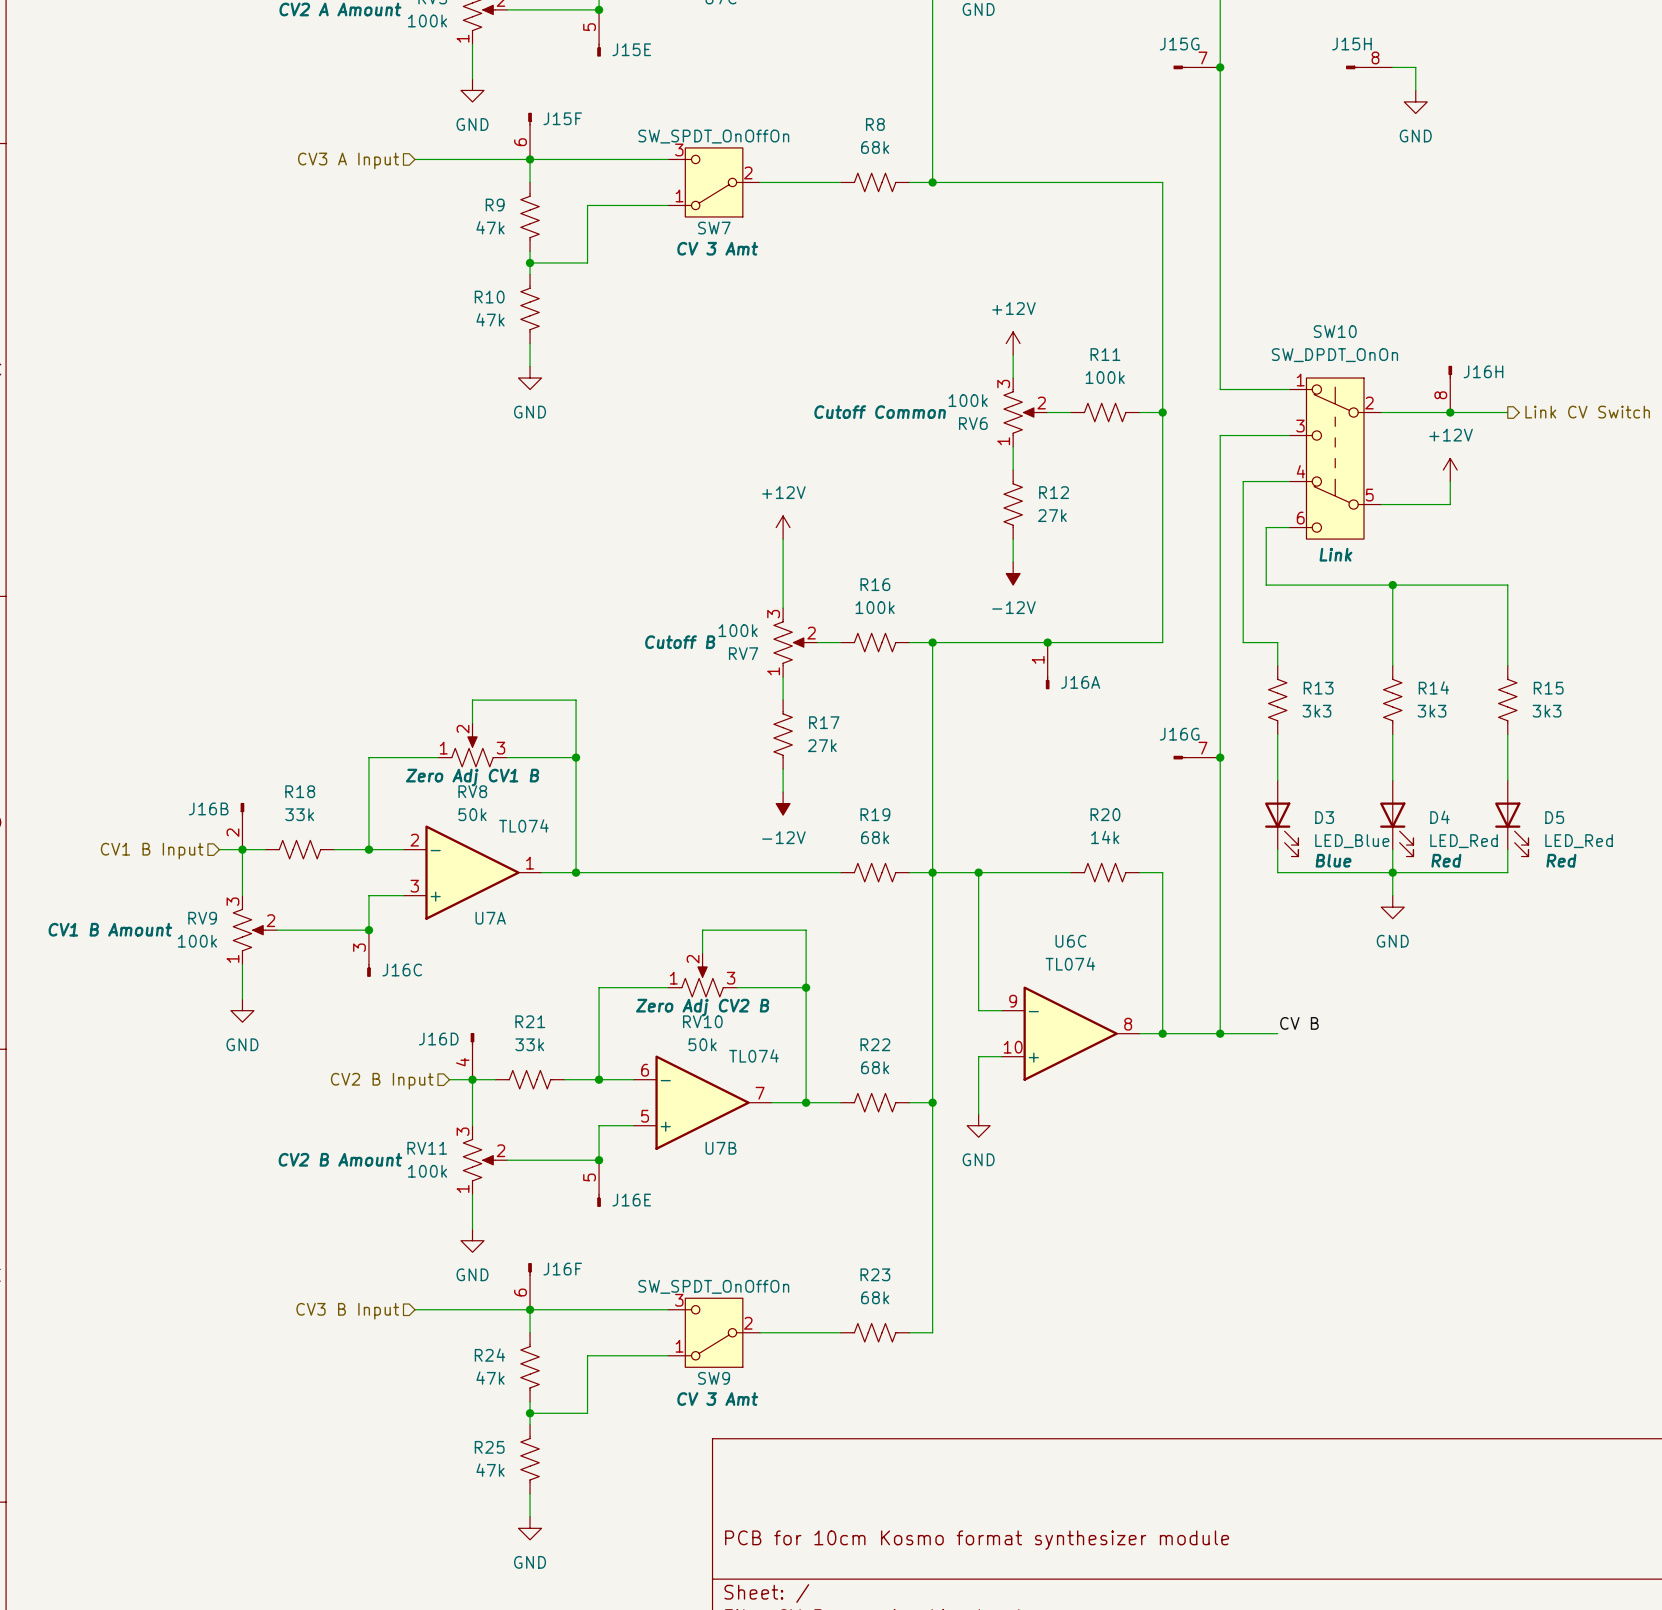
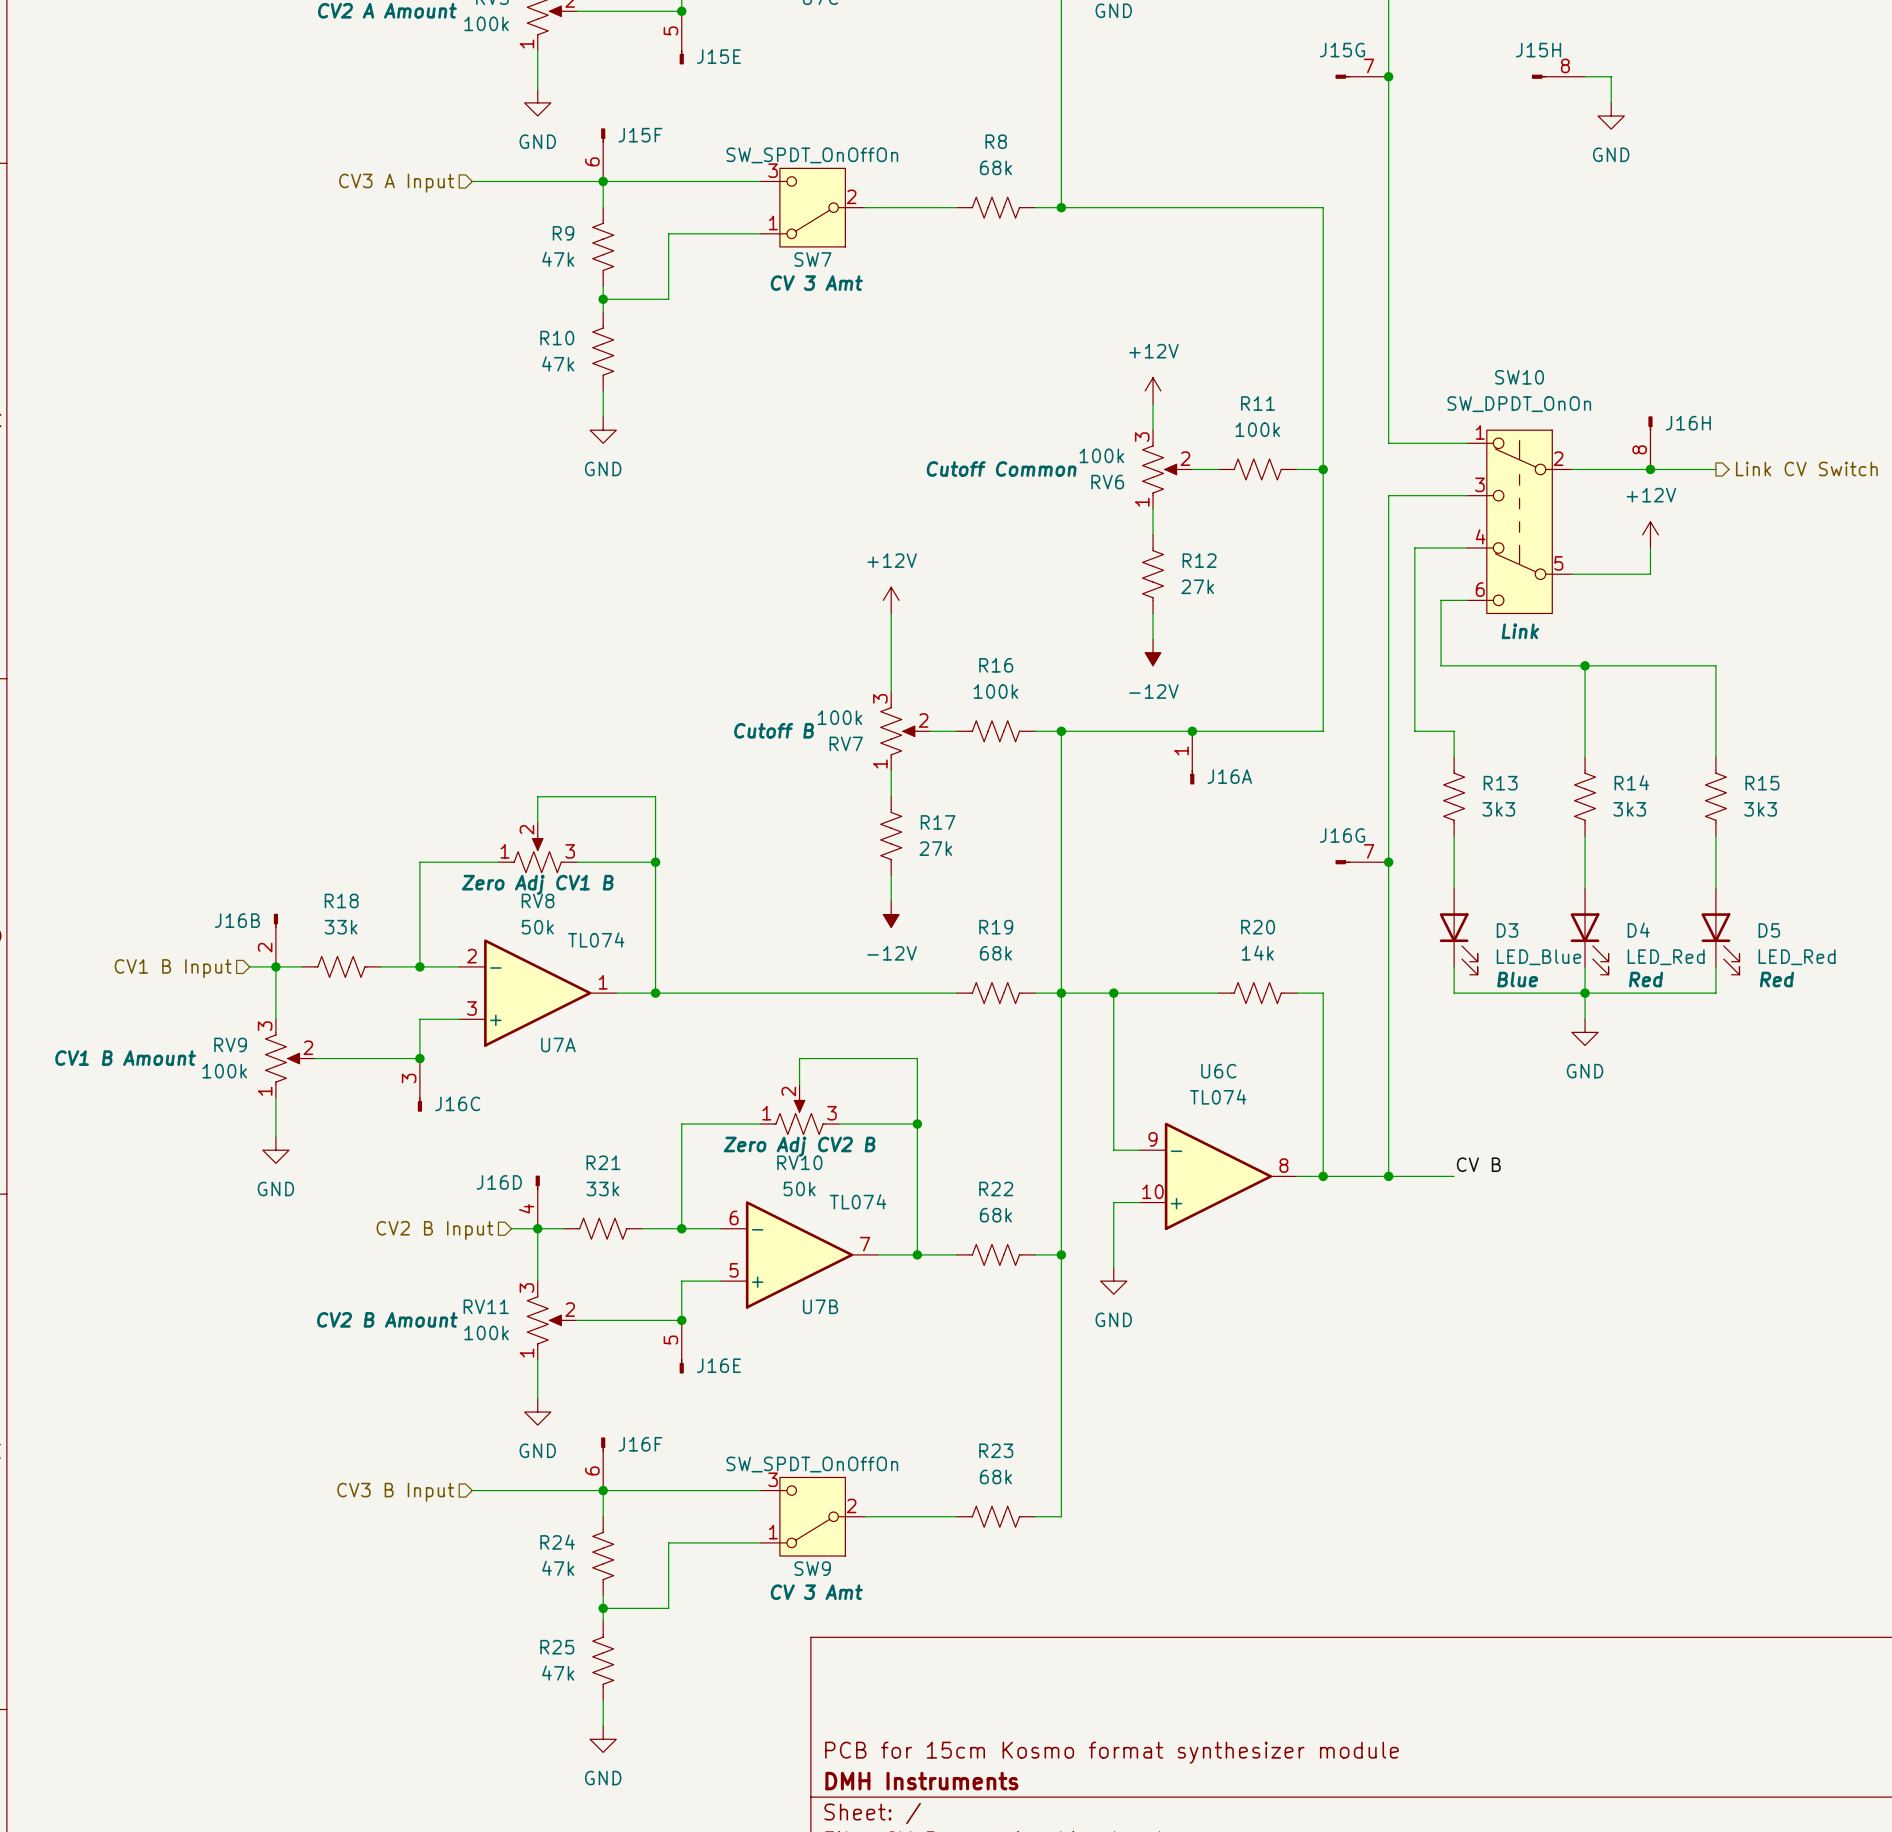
title block: PCB for 10cm Kosmo format synthesizer module (977, 1540) -> PCB for 15cm Kosmo format synthesizer module (1111, 1752)
title block: none -> DMH Instruments (921, 1781)

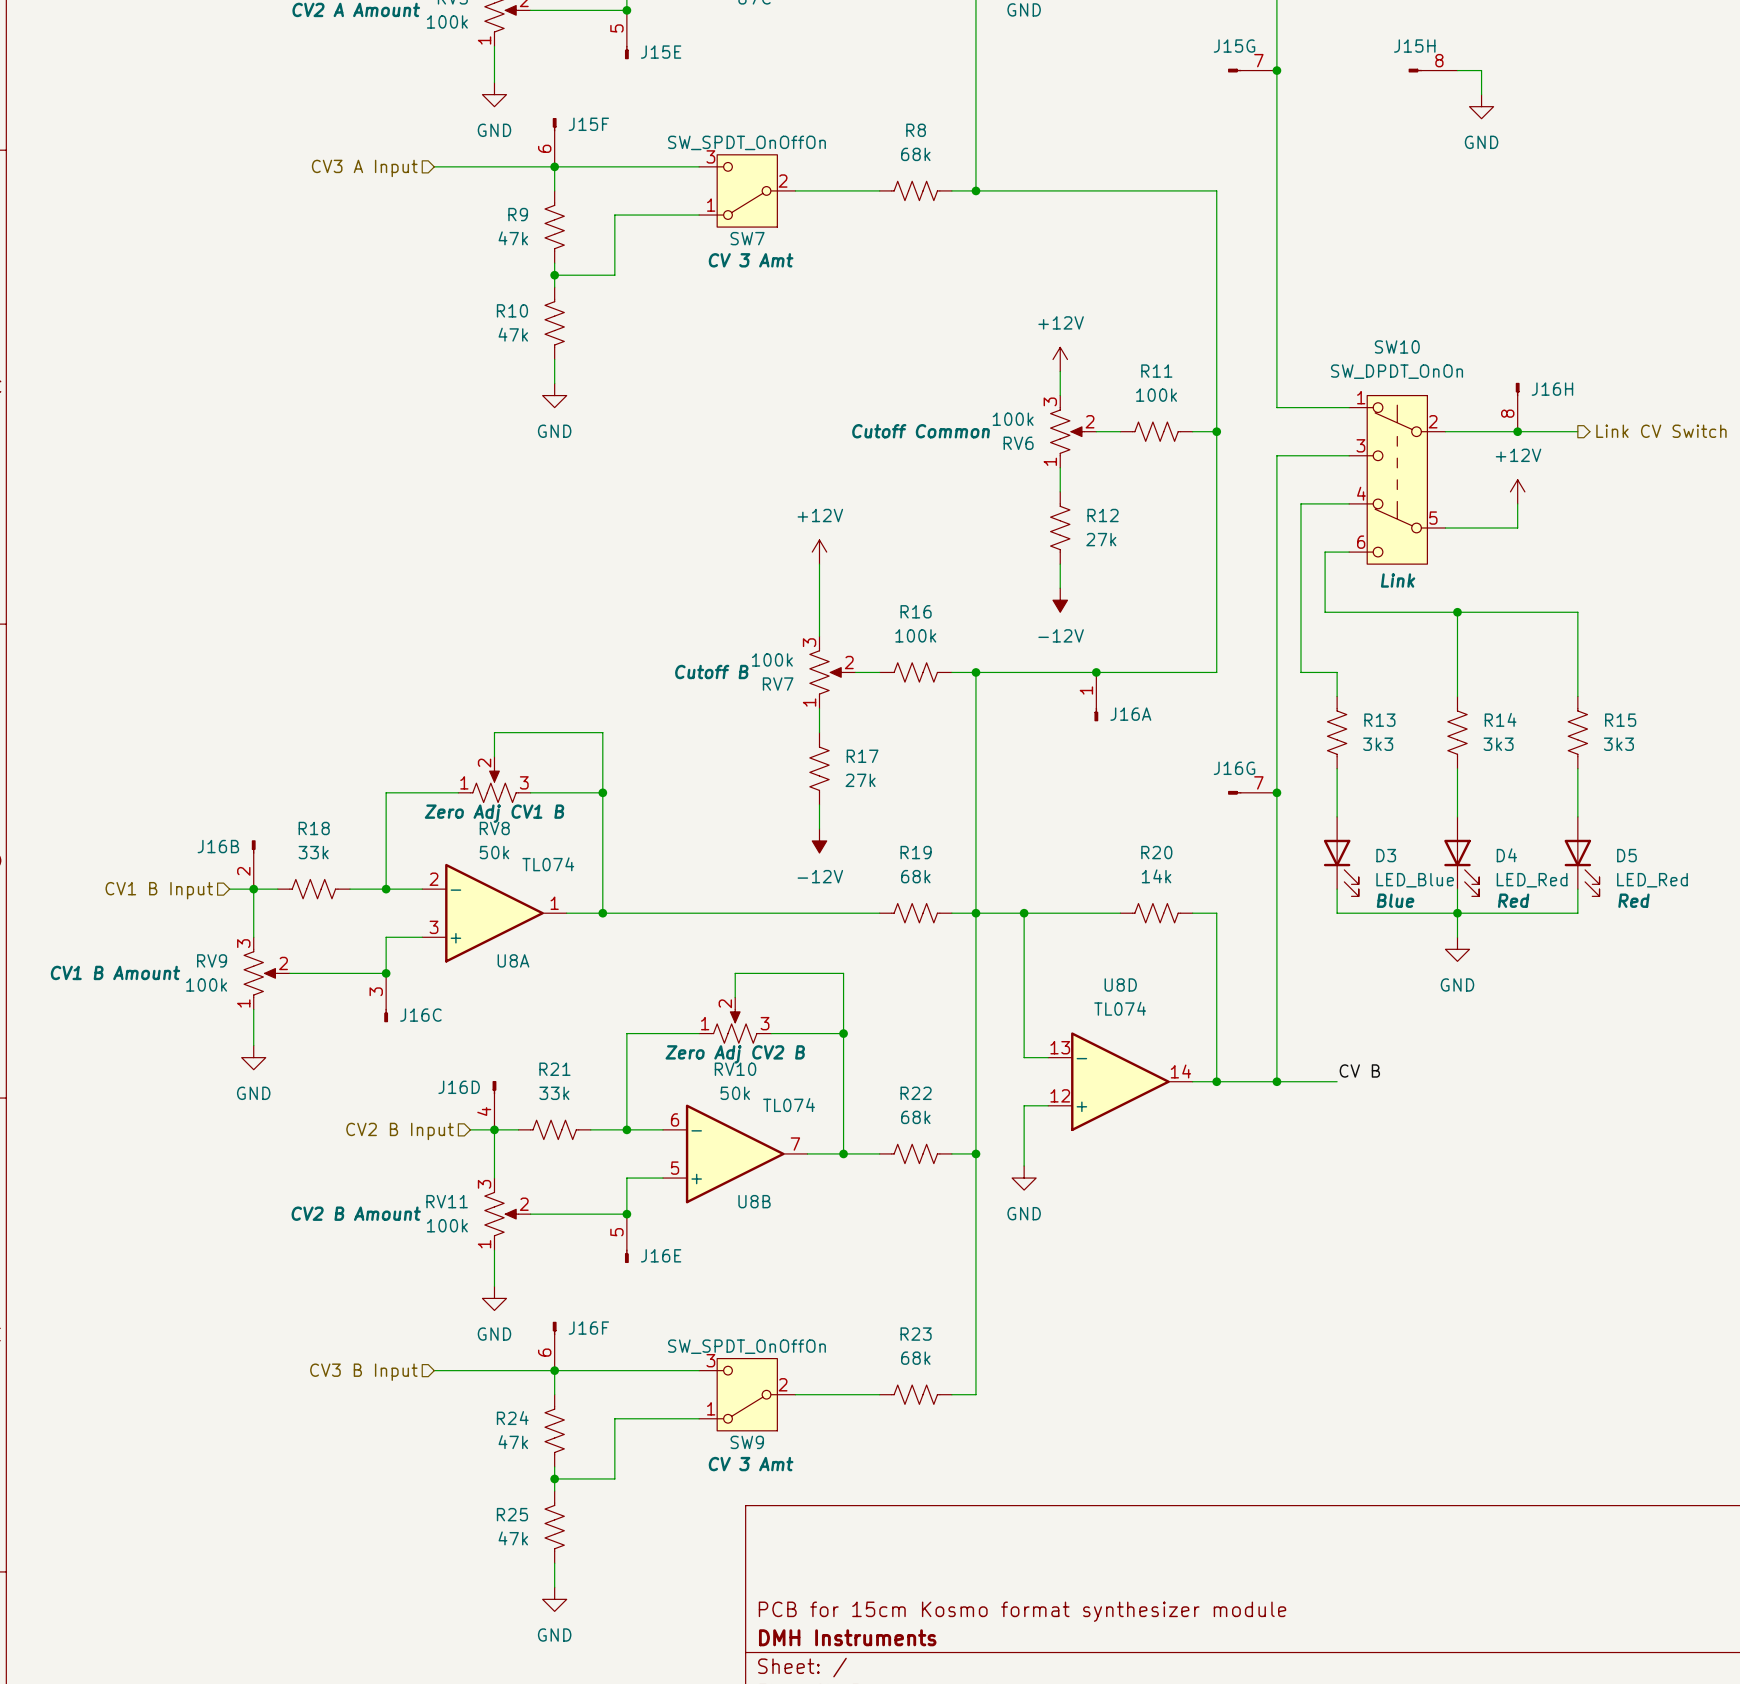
U7A name: U7A (558, 1044) -> U8A (513, 960)
U6C name: U6C (1218, 1071) -> U8D (1120, 984)
U6C pin number: 9 (1153, 1139) -> 13 (1060, 1047)
U6C pin number: 8 (1283, 1165) -> 14 (1180, 1071)
U6C pin number: 10 (1153, 1191) -> 12 (1060, 1095)
U7B name: U7B (820, 1306) -> U8B (754, 1201)

